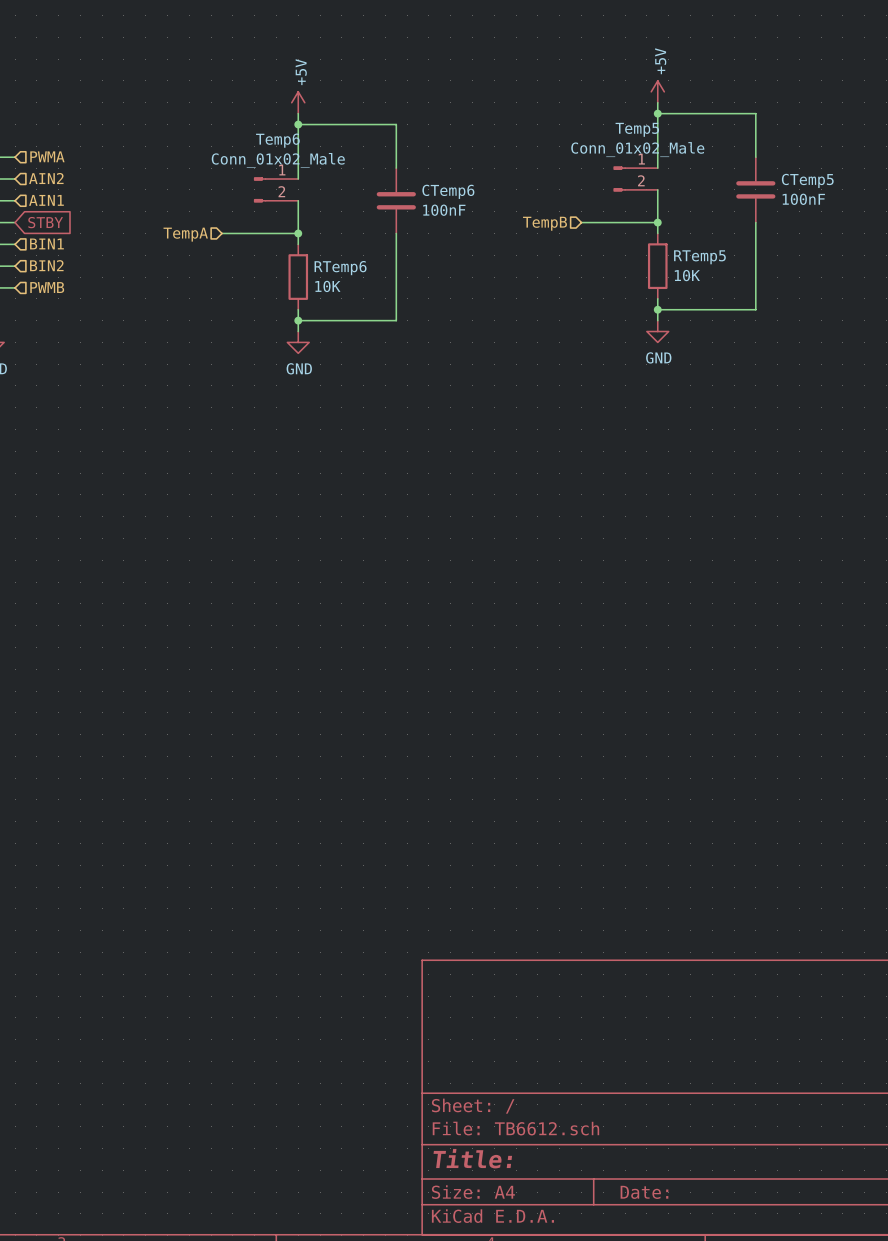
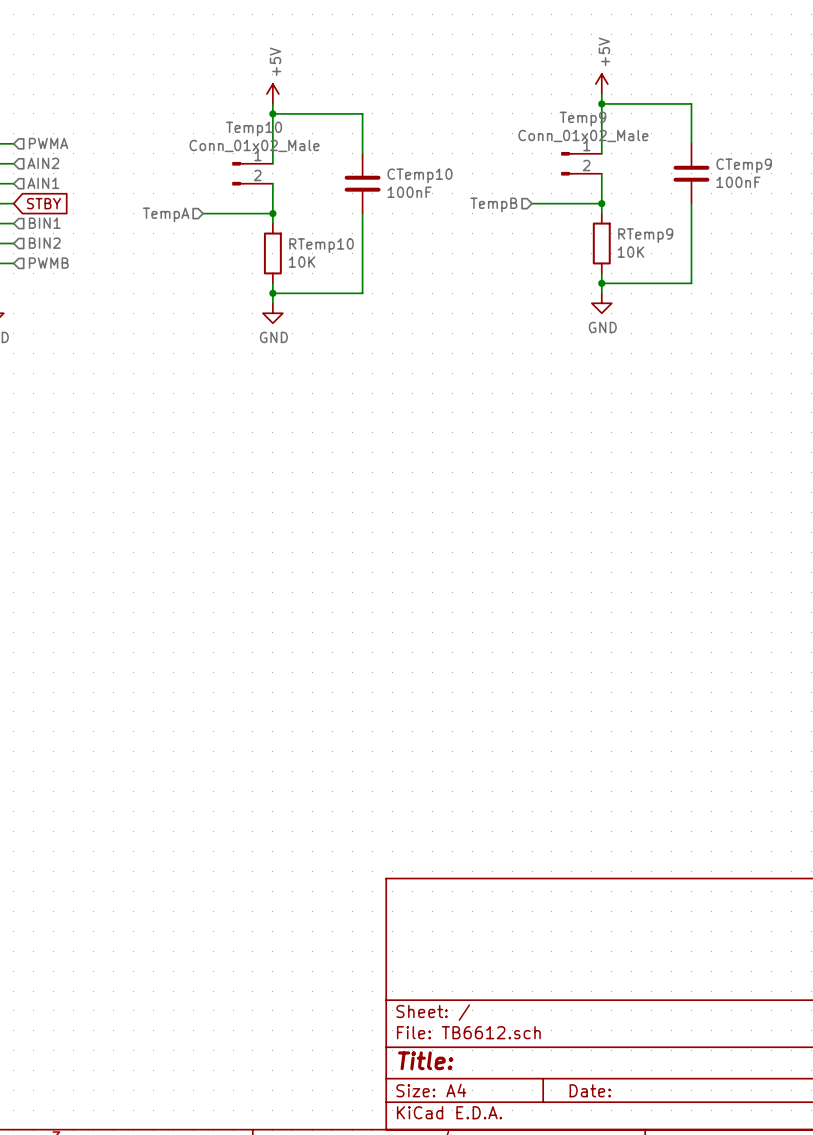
Temp5 name: Temp5 (637, 129) -> Temp9 (582, 119)
Temp6 name: Temp6 (277, 140) -> Temp10 (254, 128)
CTemp5 name: CTemp5 (807, 180) -> CTemp9 (744, 165)
CTemp6 name: CTemp6 (448, 191) -> CTemp10 (419, 175)
RTemp5 name: RTemp5 (699, 257) -> RTemp9 (645, 235)
RTemp6 name: RTemp6 (340, 268) -> RTemp10 (321, 245)

